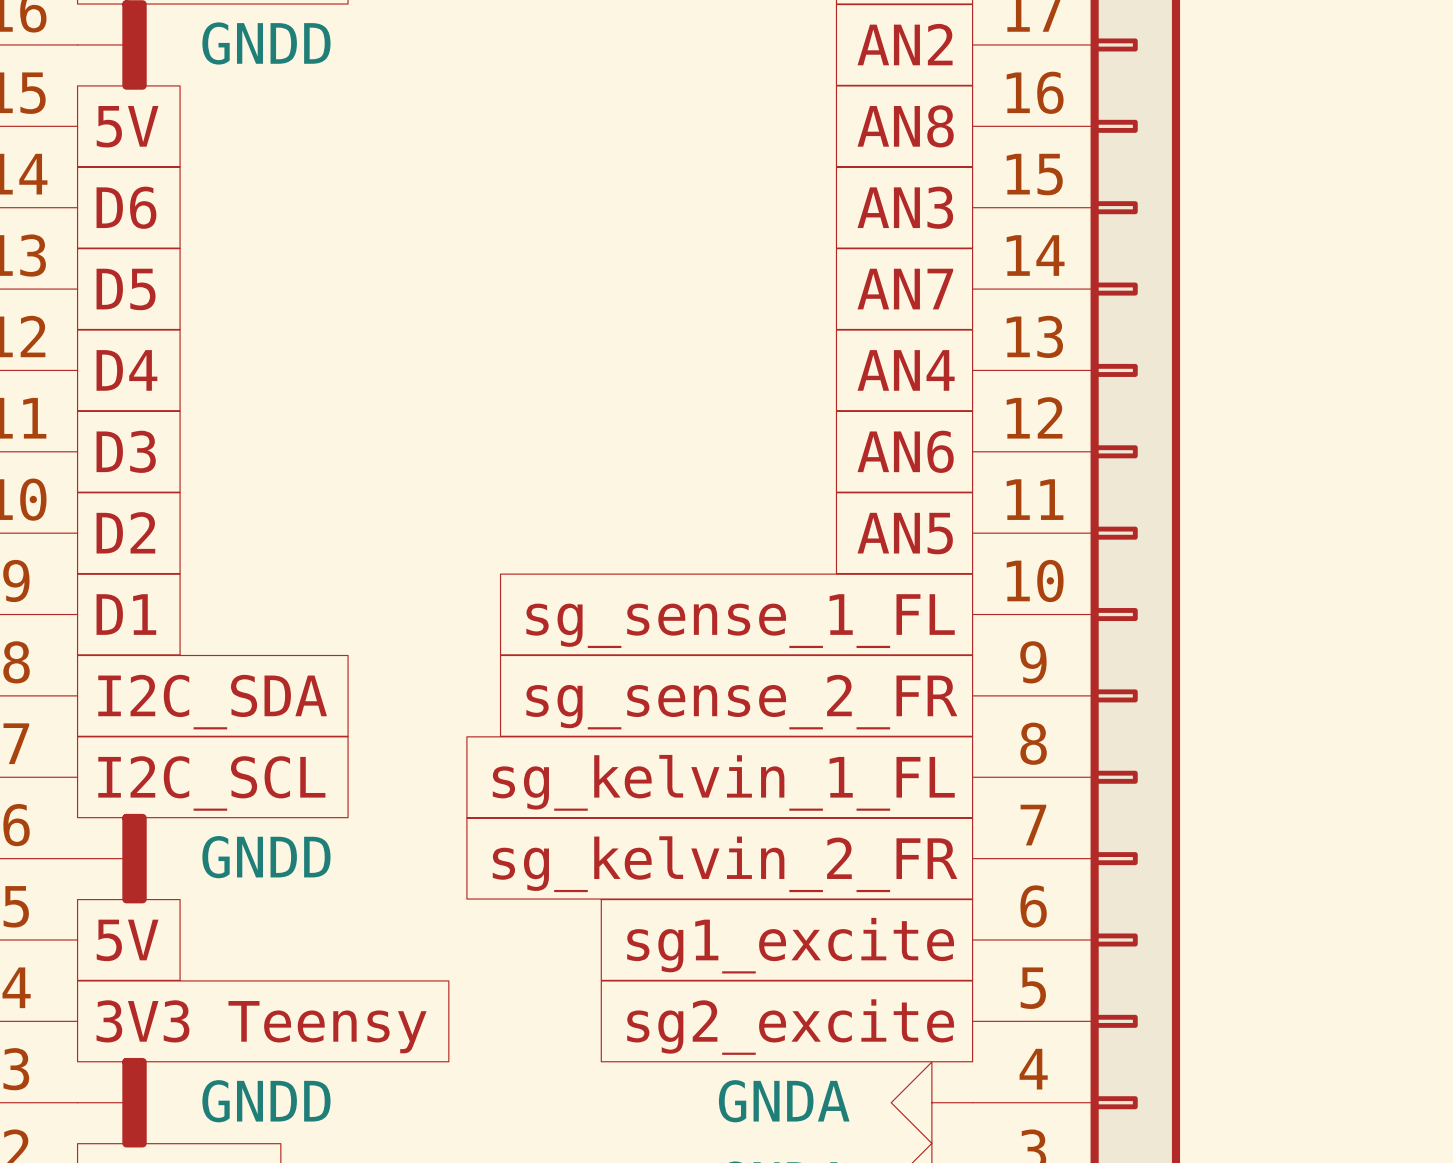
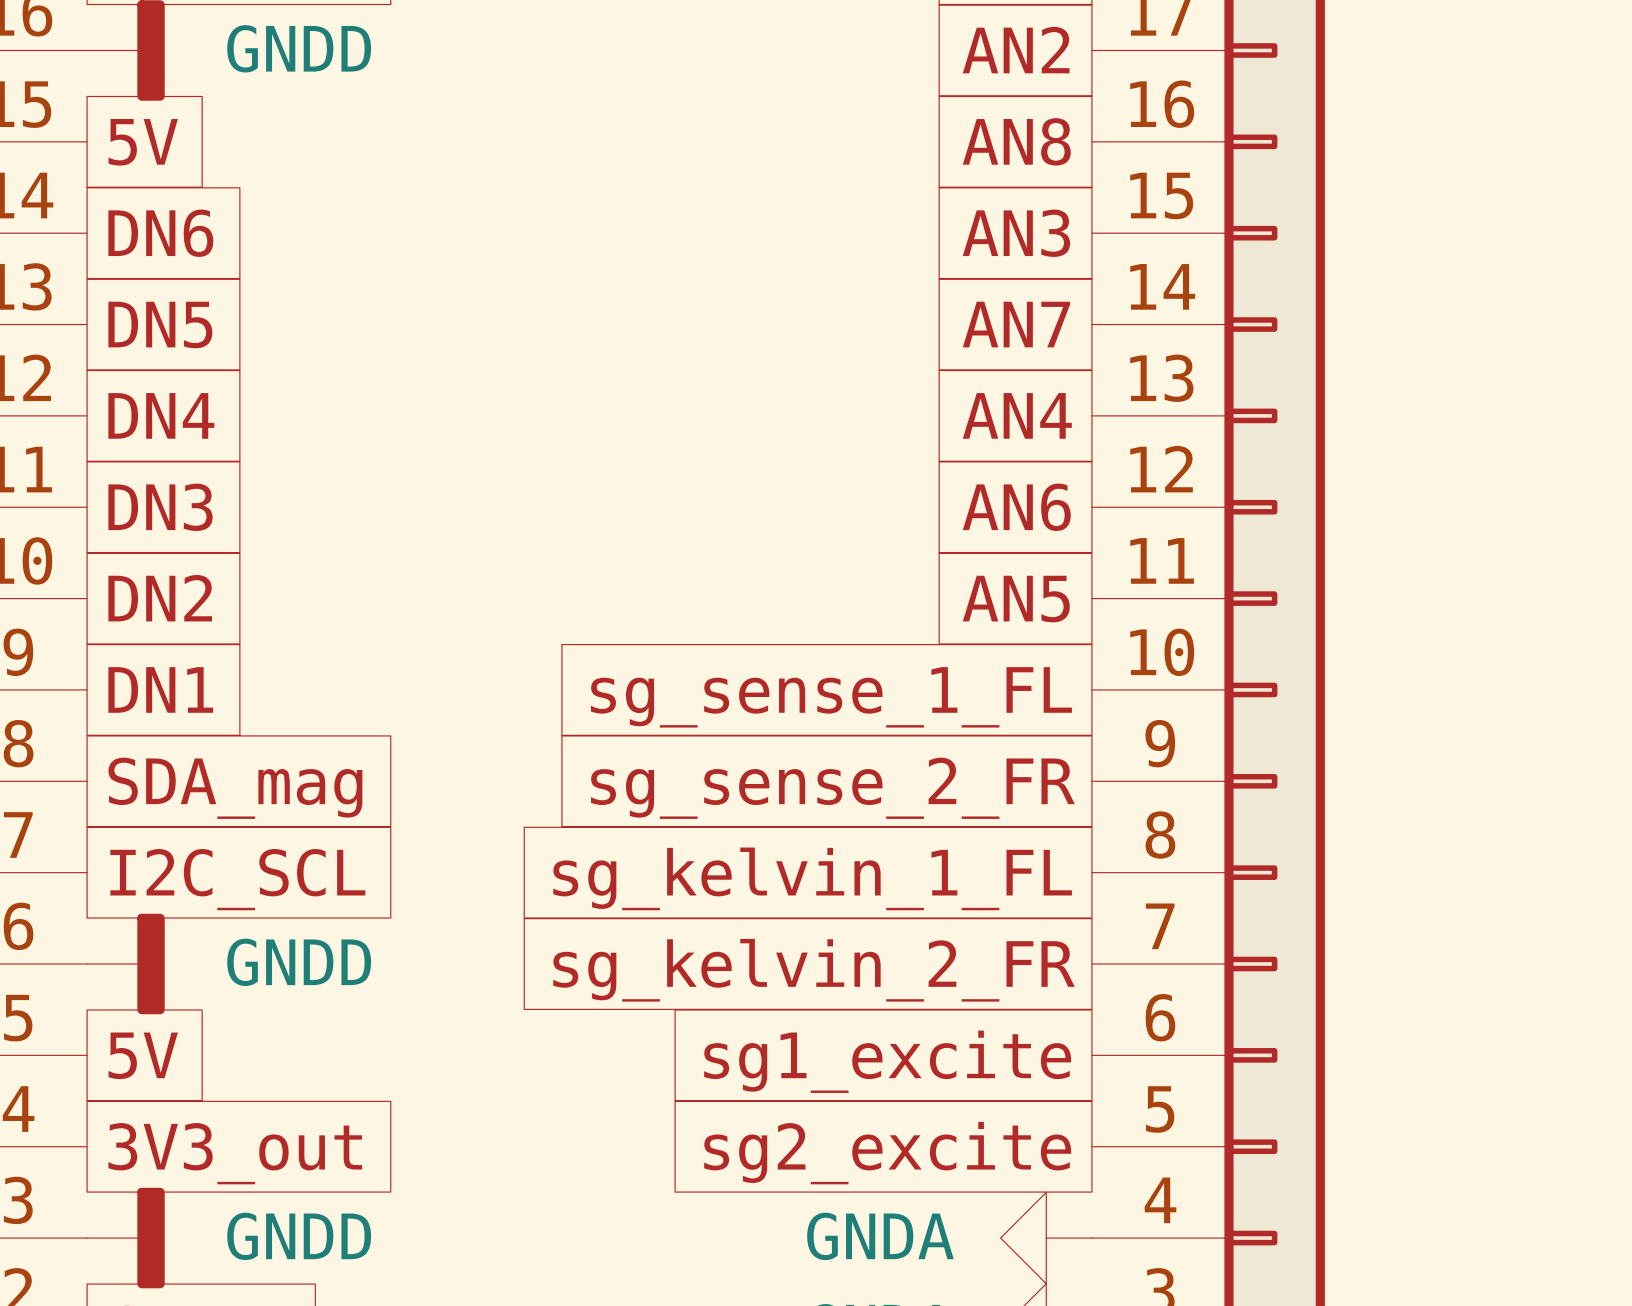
global label: D6 (126, 207) -> DN6 (160, 233)
global label: D5 (126, 289) -> DN5 (160, 324)
global label: D4 (126, 370) -> DN4 (161, 415)
global label: D3 (126, 451) -> DN3 (160, 507)
global label: D2 (125, 532) -> DN2 (160, 598)
global label: D1 (126, 614) -> DN1 (160, 689)
global label: I2C_SDA (212, 702) -> SDA_mag (235, 788)
global label: 3V3 Teensy (261, 1026) -> 3V3_out (235, 1153)

